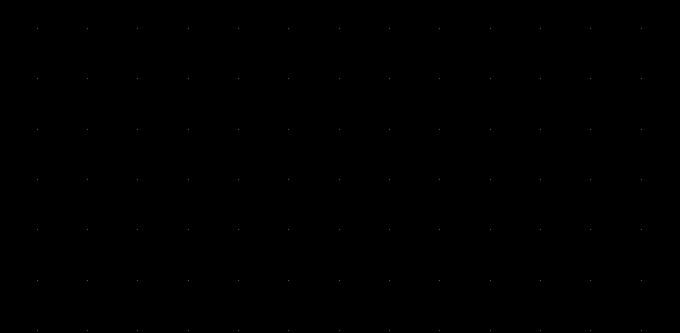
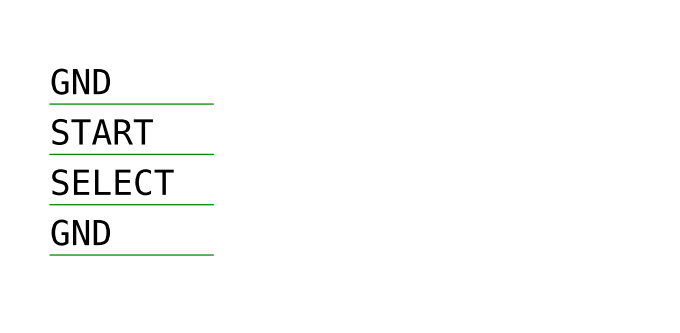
label: none -> GND (80, 81)
wire: none -> (49, 104) (213, 104)
label: none -> START (102, 131)
wire: none -> (49, 154) (213, 154)
label: none -> SELECT (112, 182)
wire: none -> (49, 204) (213, 204)
label: none -> GND (80, 232)
wire: none -> (49, 255) (213, 255)

